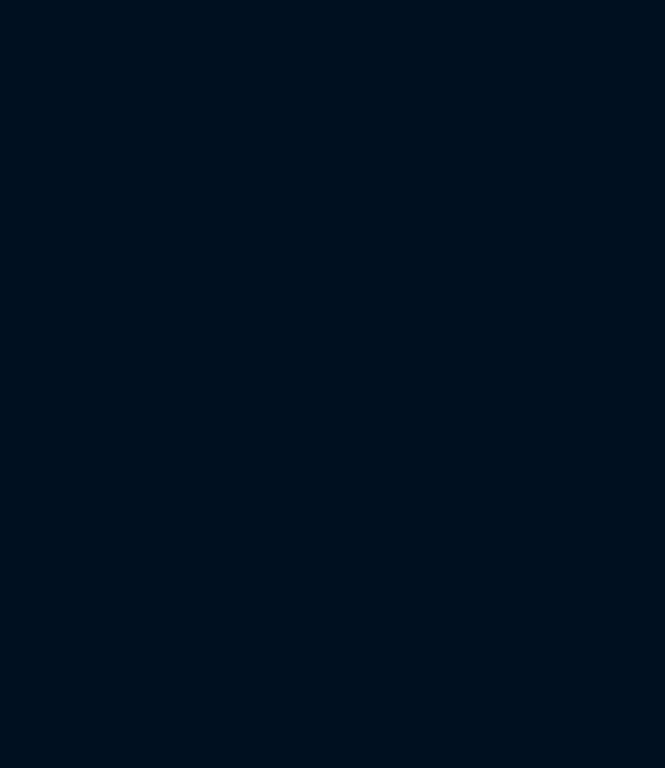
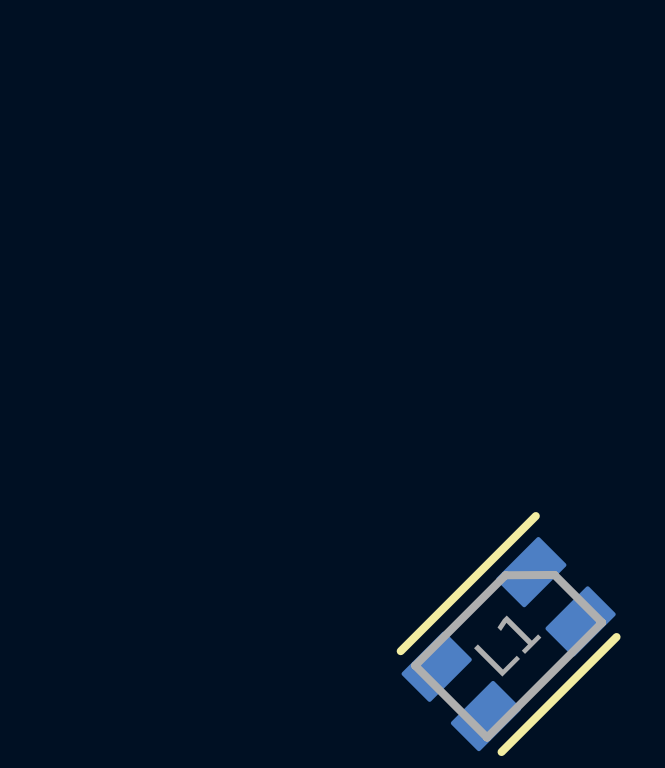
L1: none -> (508, 634)

